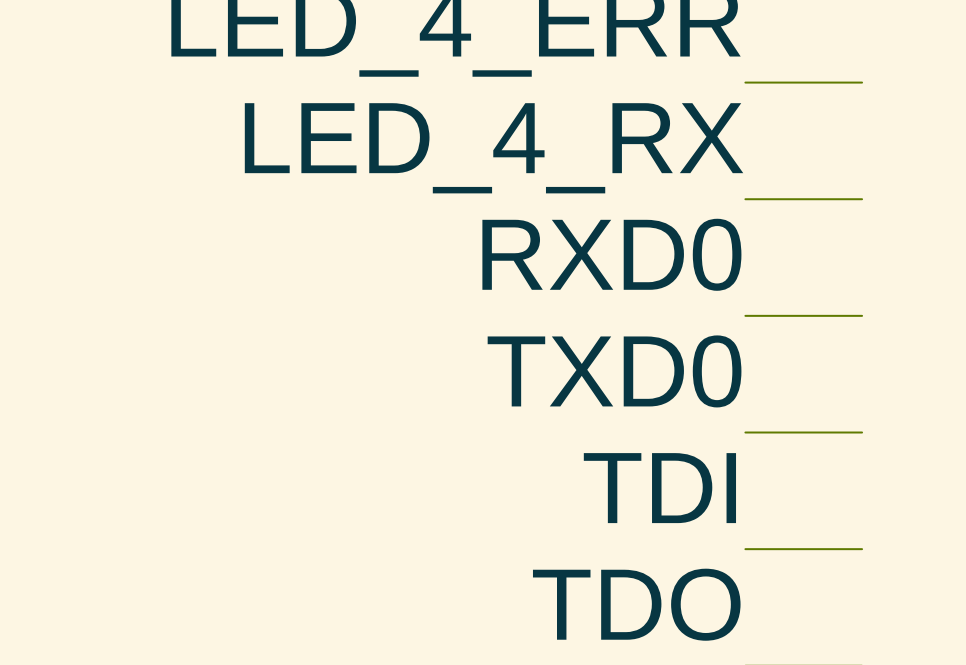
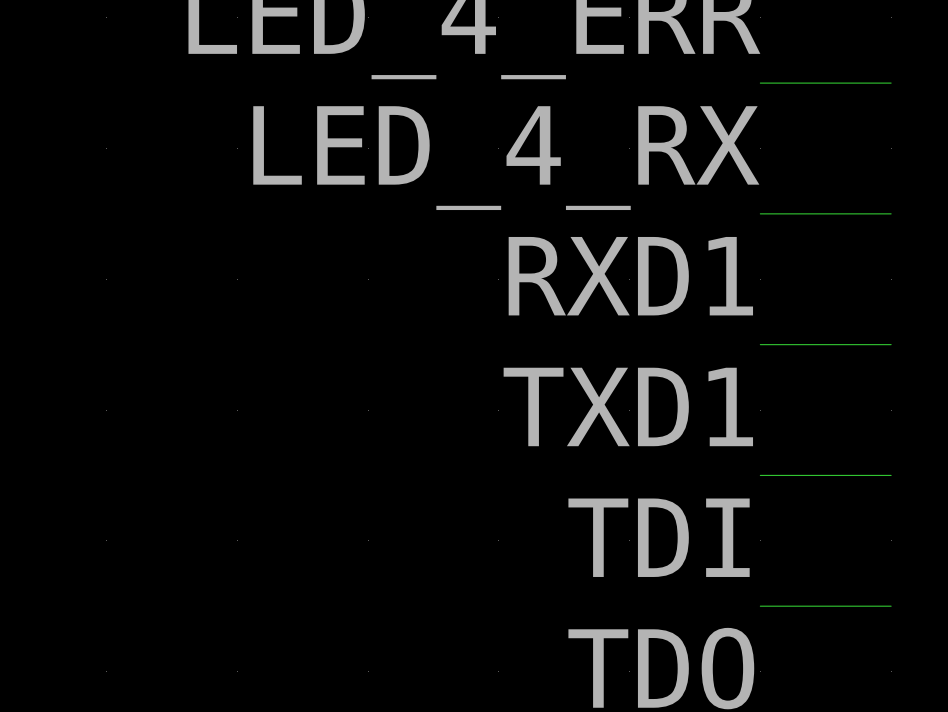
label: RXD0 (611, 254) -> RXD1 (630, 276)
label: TXD0 (614, 371) -> TXD1 (628, 406)

